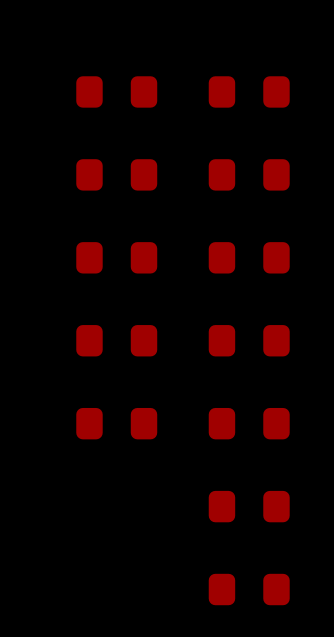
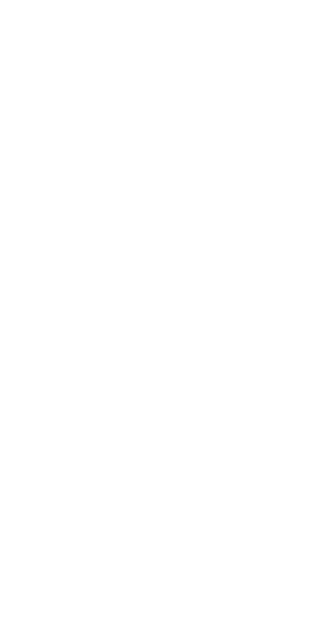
part: (116, 91) -> none
part: (249, 91) -> none
part: (116, 174) -> none
part: (249, 174) -> none
part: (116, 257) -> none
part: (249, 257) -> none
part: (116, 340) -> none
part: (249, 340) -> none
part: (116, 423) -> none
part: (249, 423) -> none
part: (249, 506) -> none
part: (249, 589) -> none

